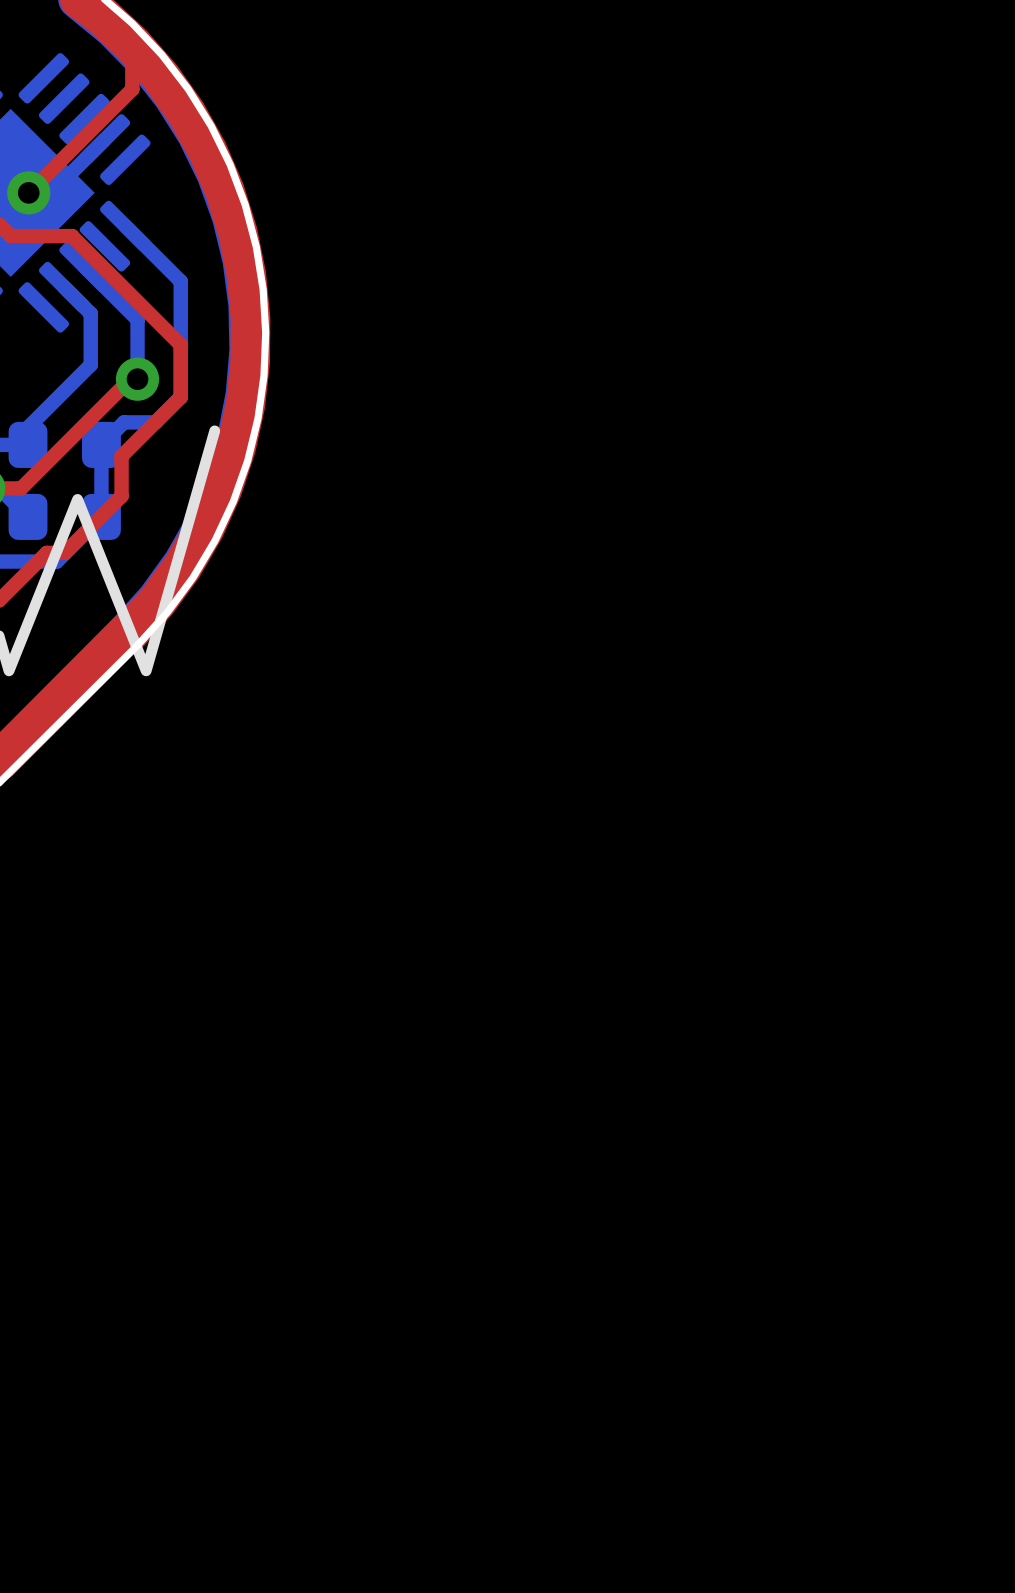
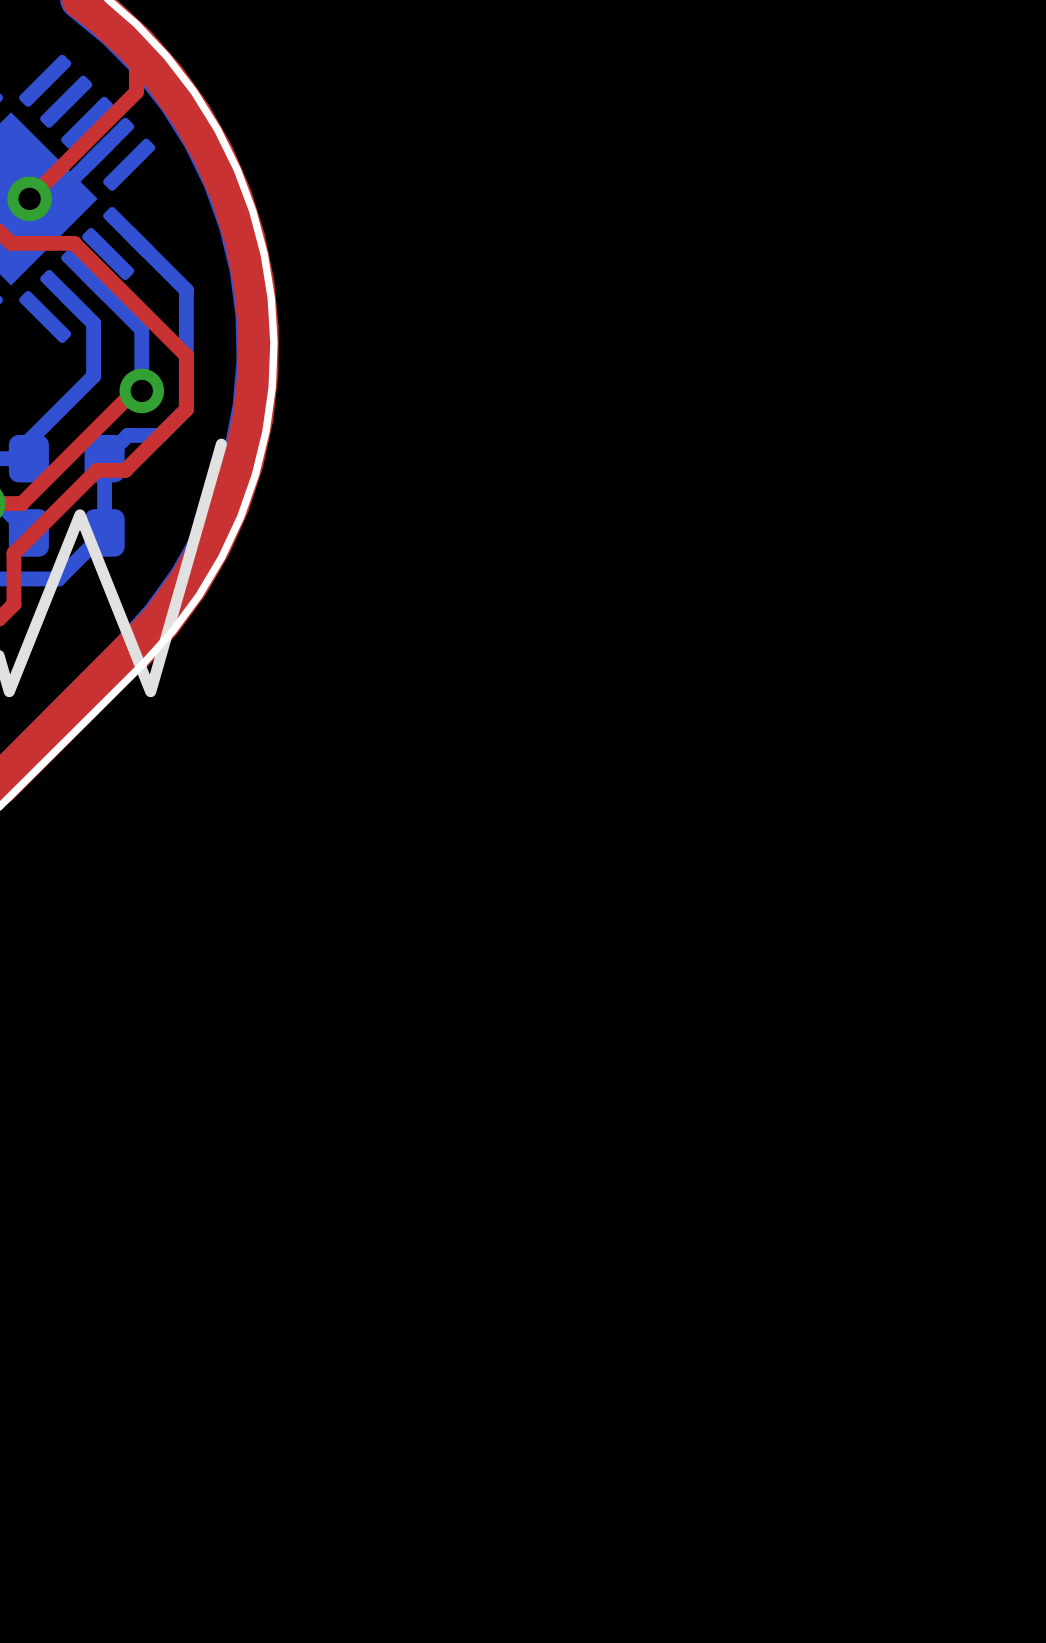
top track: (121, 456) (121, 496) (64, 552) (46, 552) (13, 586) -> (125, 470) (97, 470) (13, 553) (13, 604)

